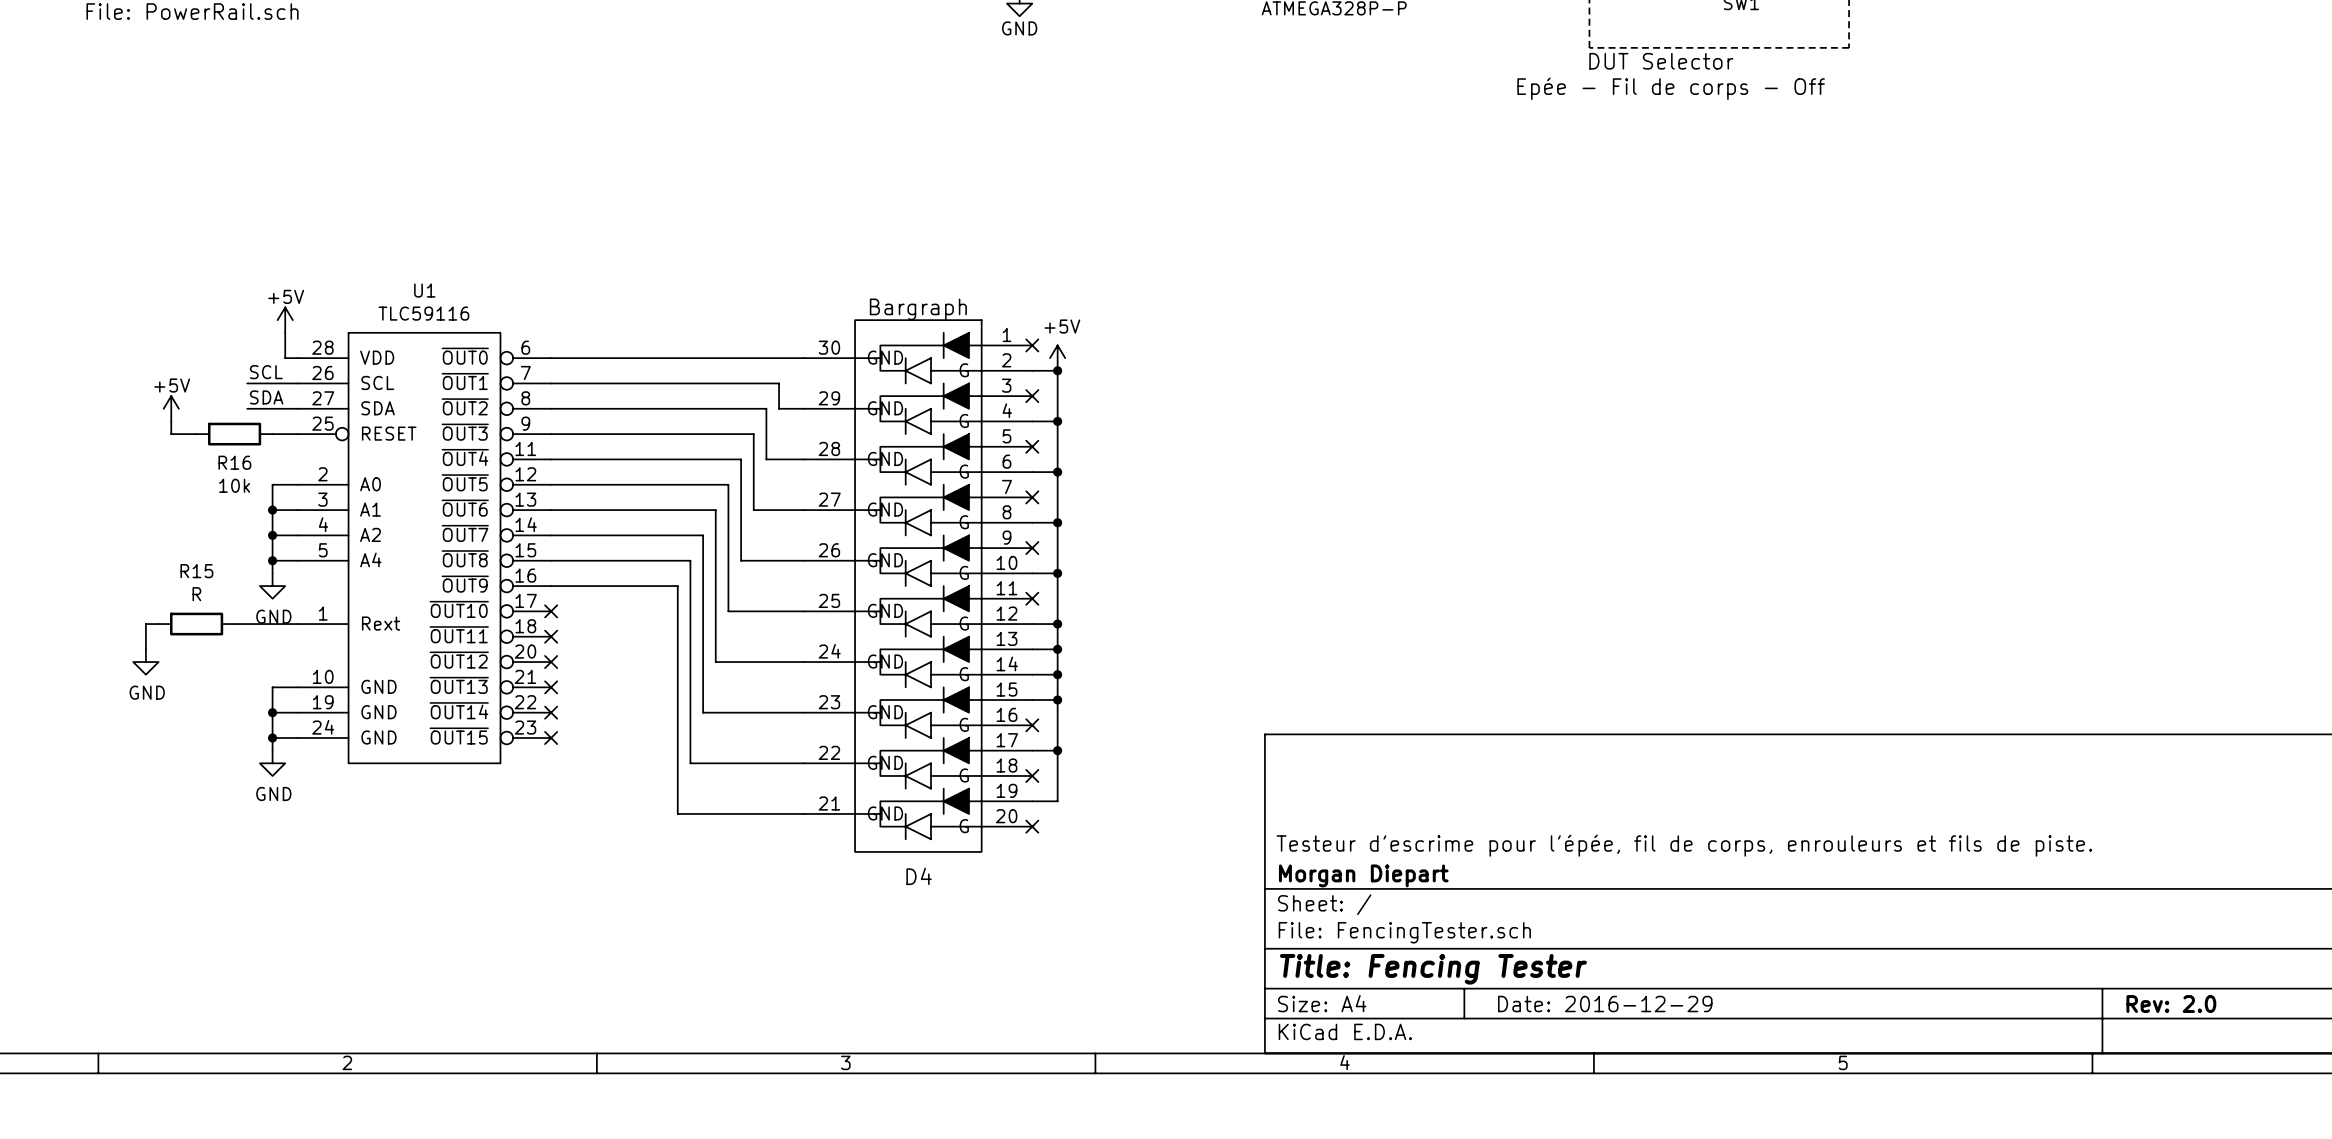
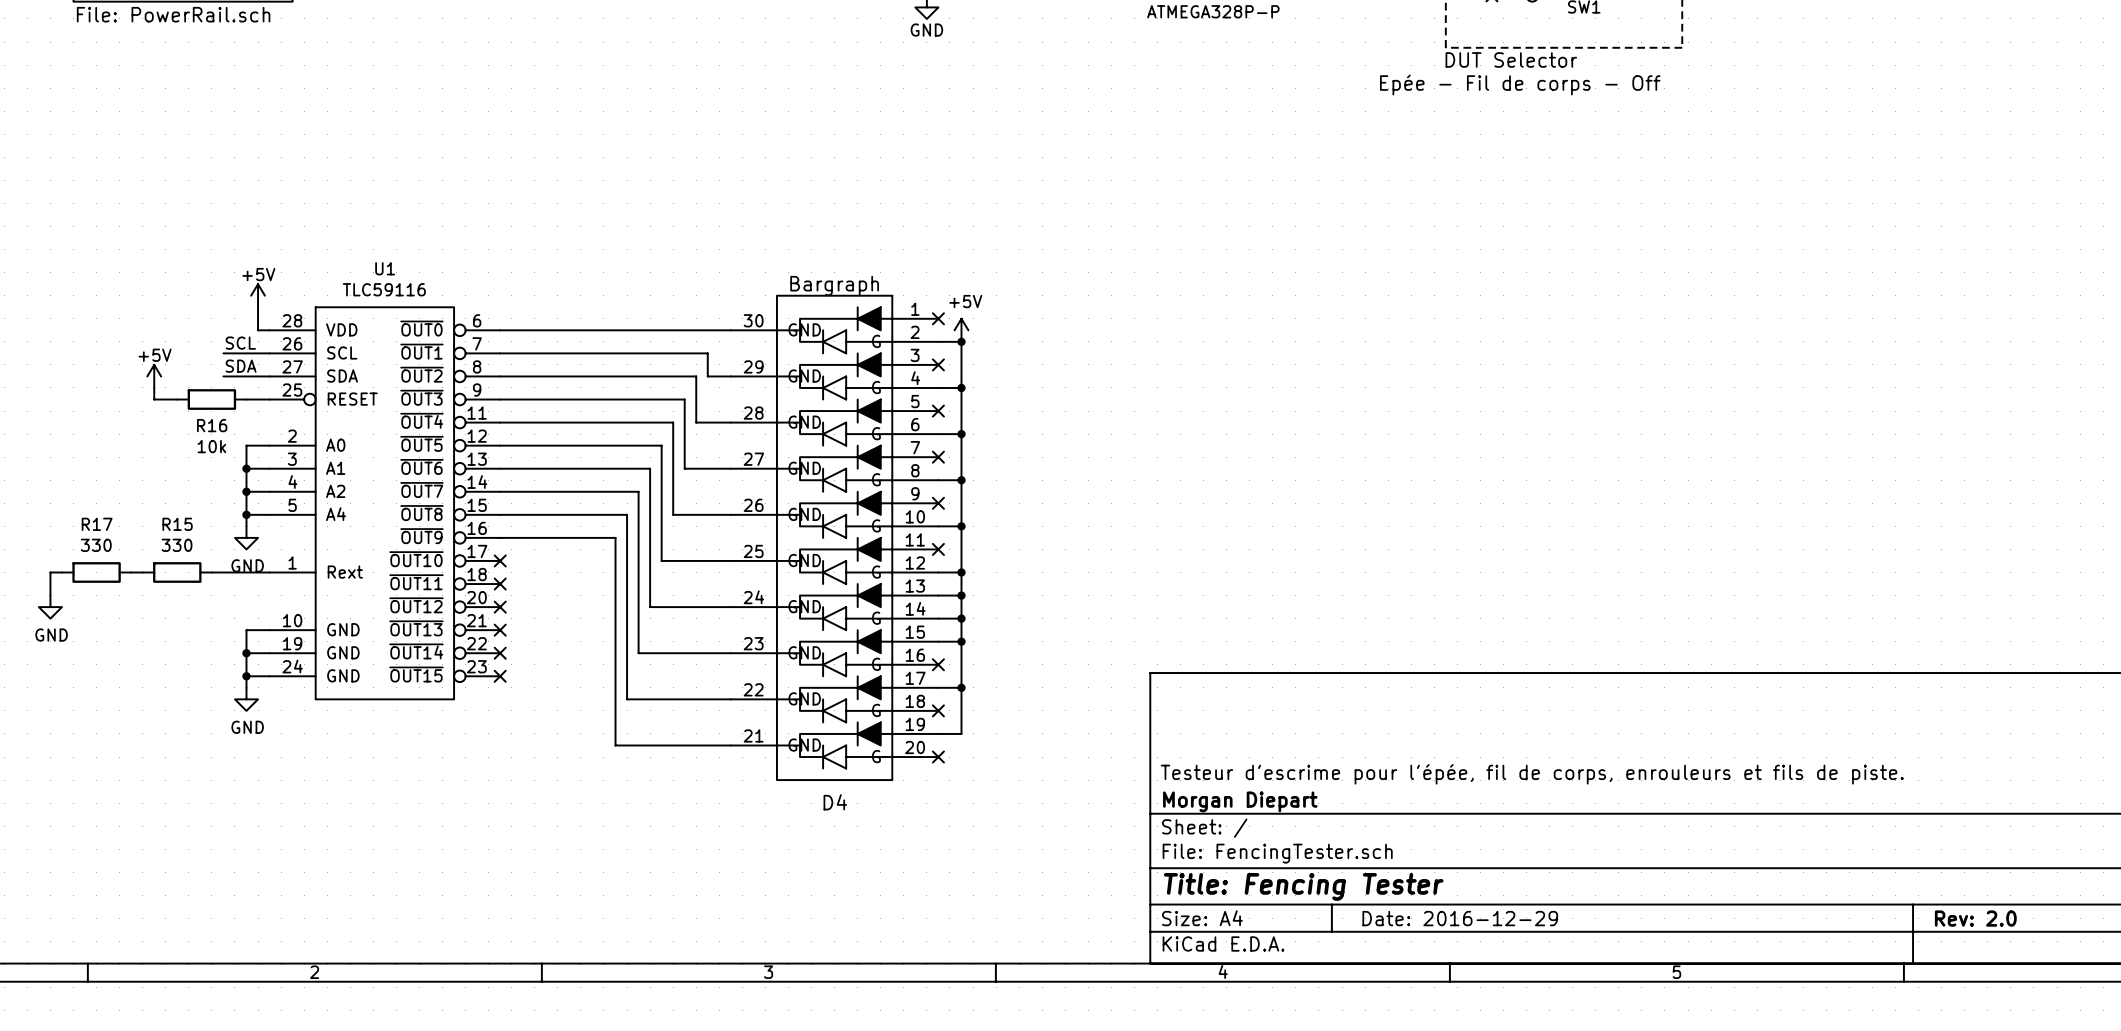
R15 value: R (196, 594) -> 330 (177, 545)
wire: none -> (61, 572) (50, 572) (50, 595)
R17: none -> 330 (96, 572)
wire: (145, 624) (145, 649) -> none
power symbol position: GND (145, 662) -> GND (50, 607)

